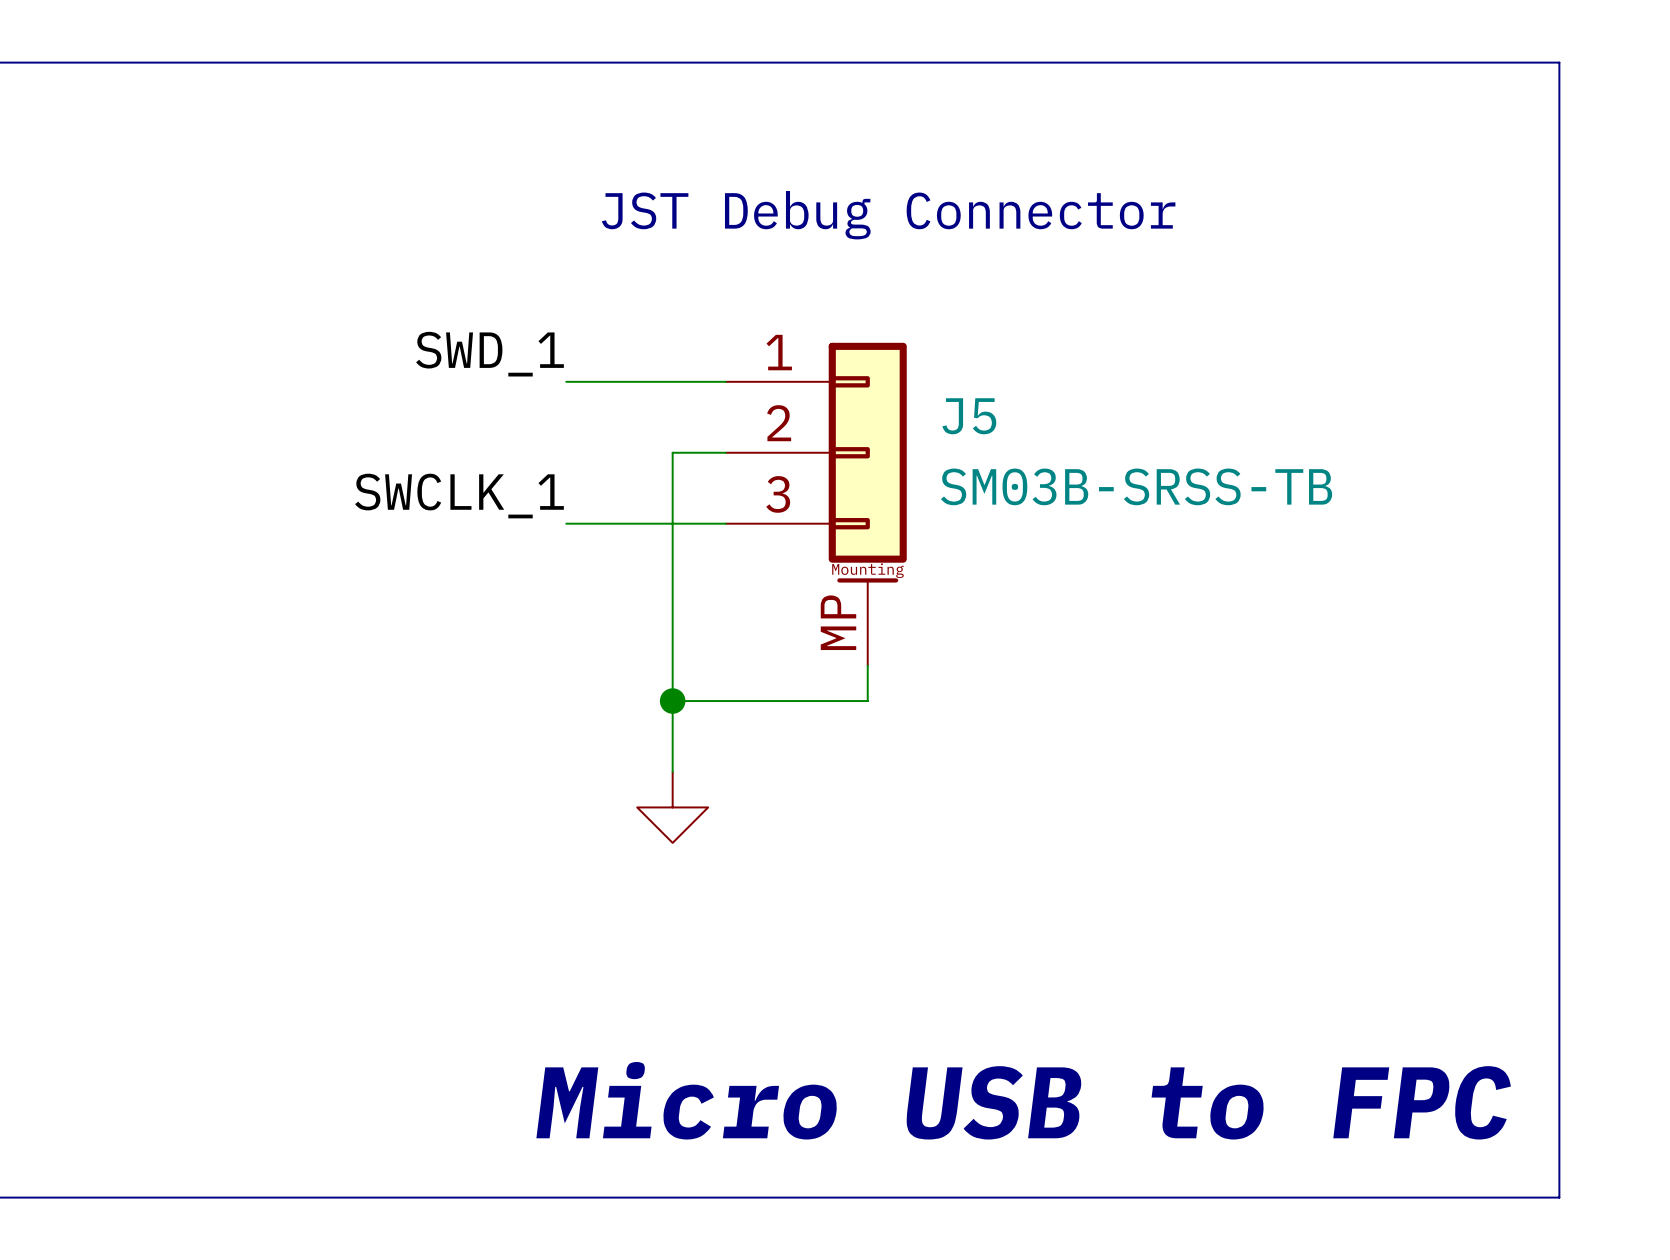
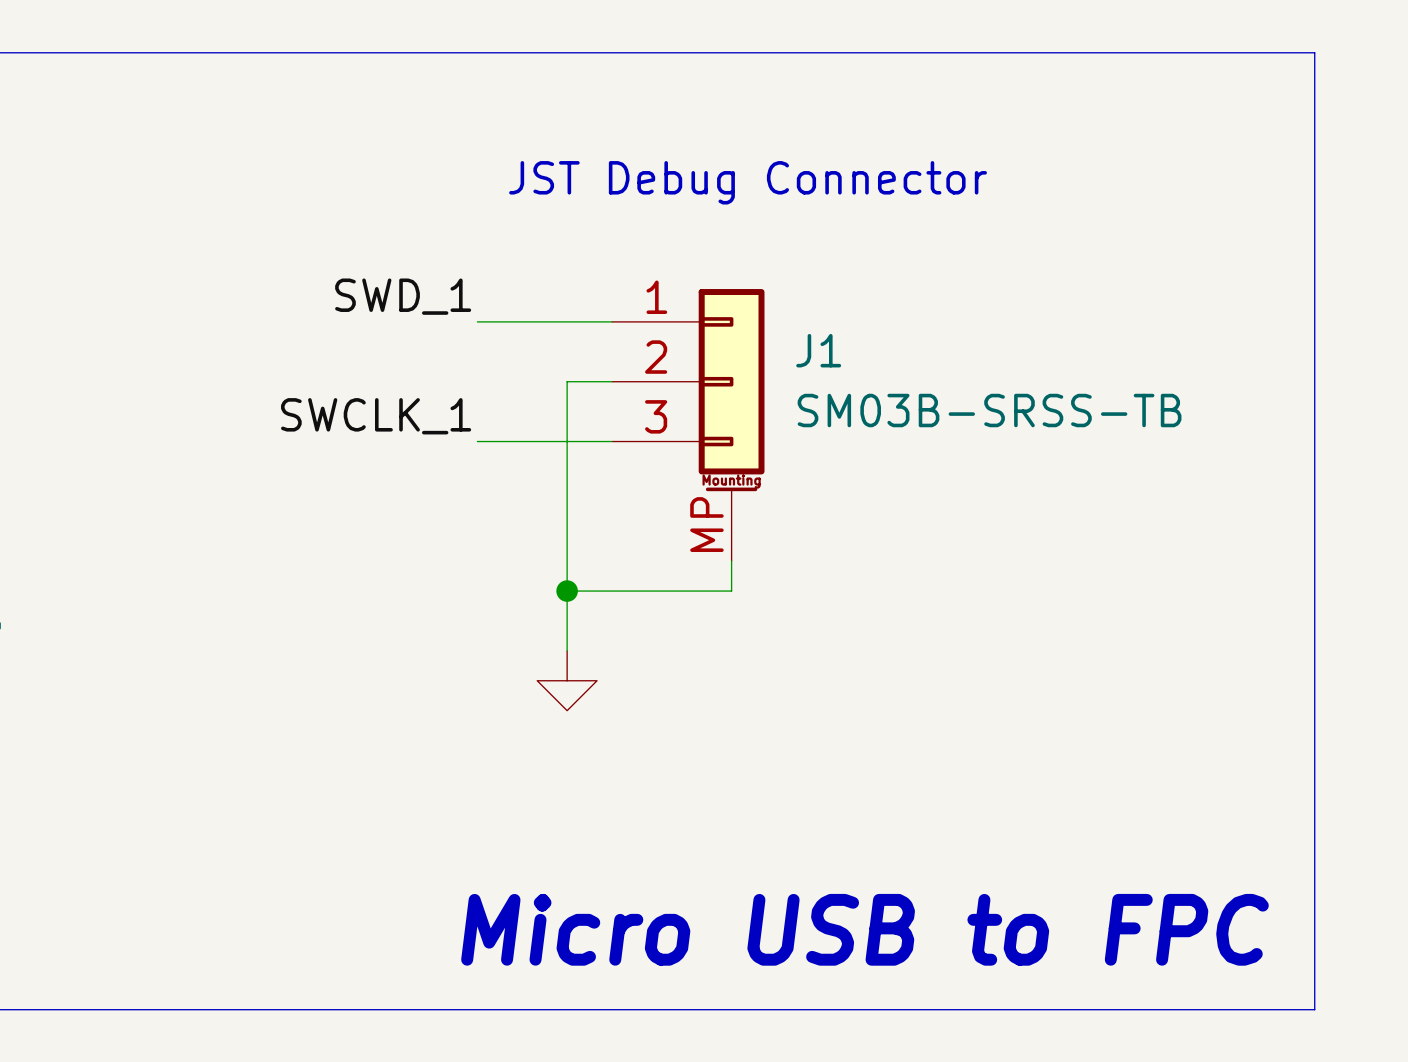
J5 name: J5 (969, 416) -> J1 (818, 350)

